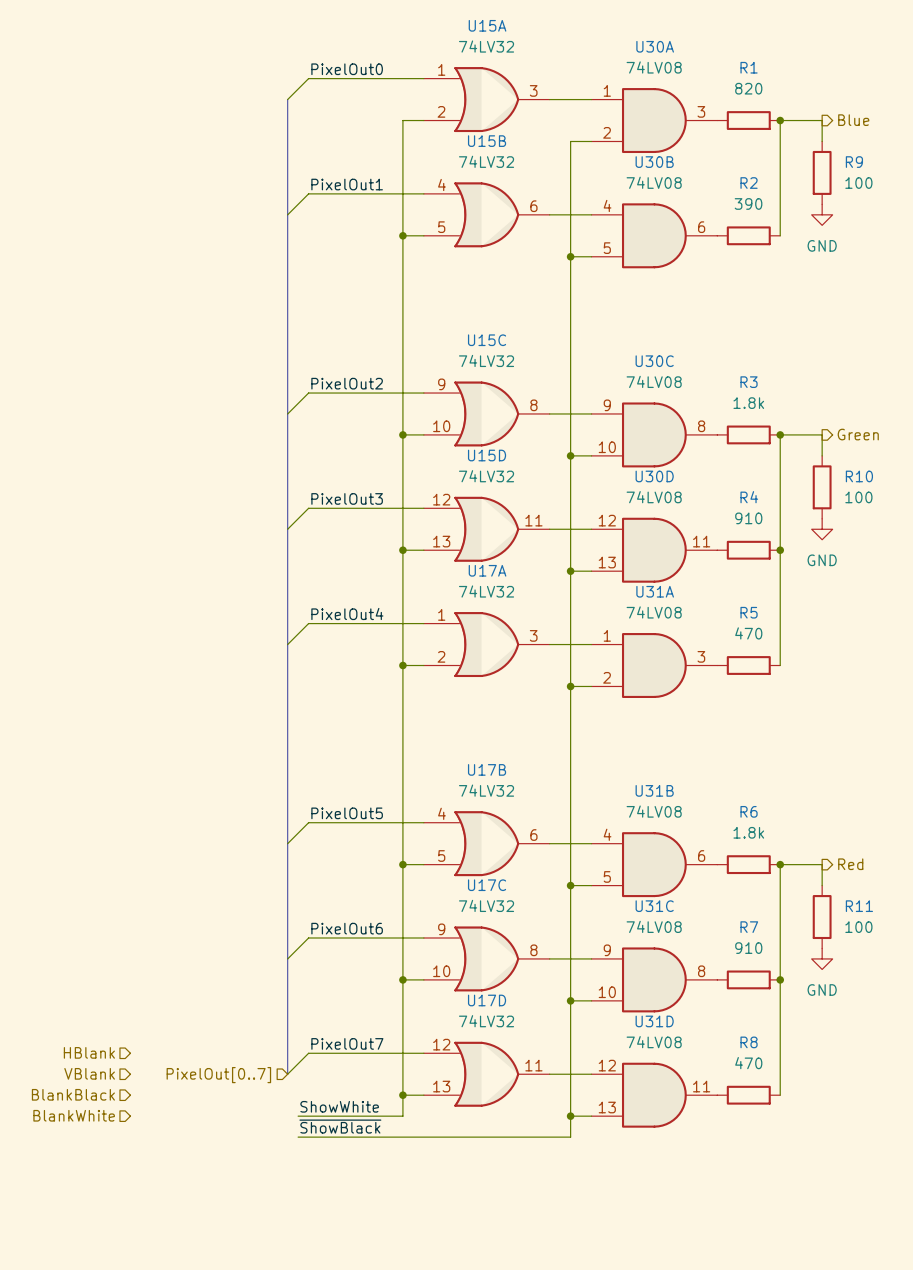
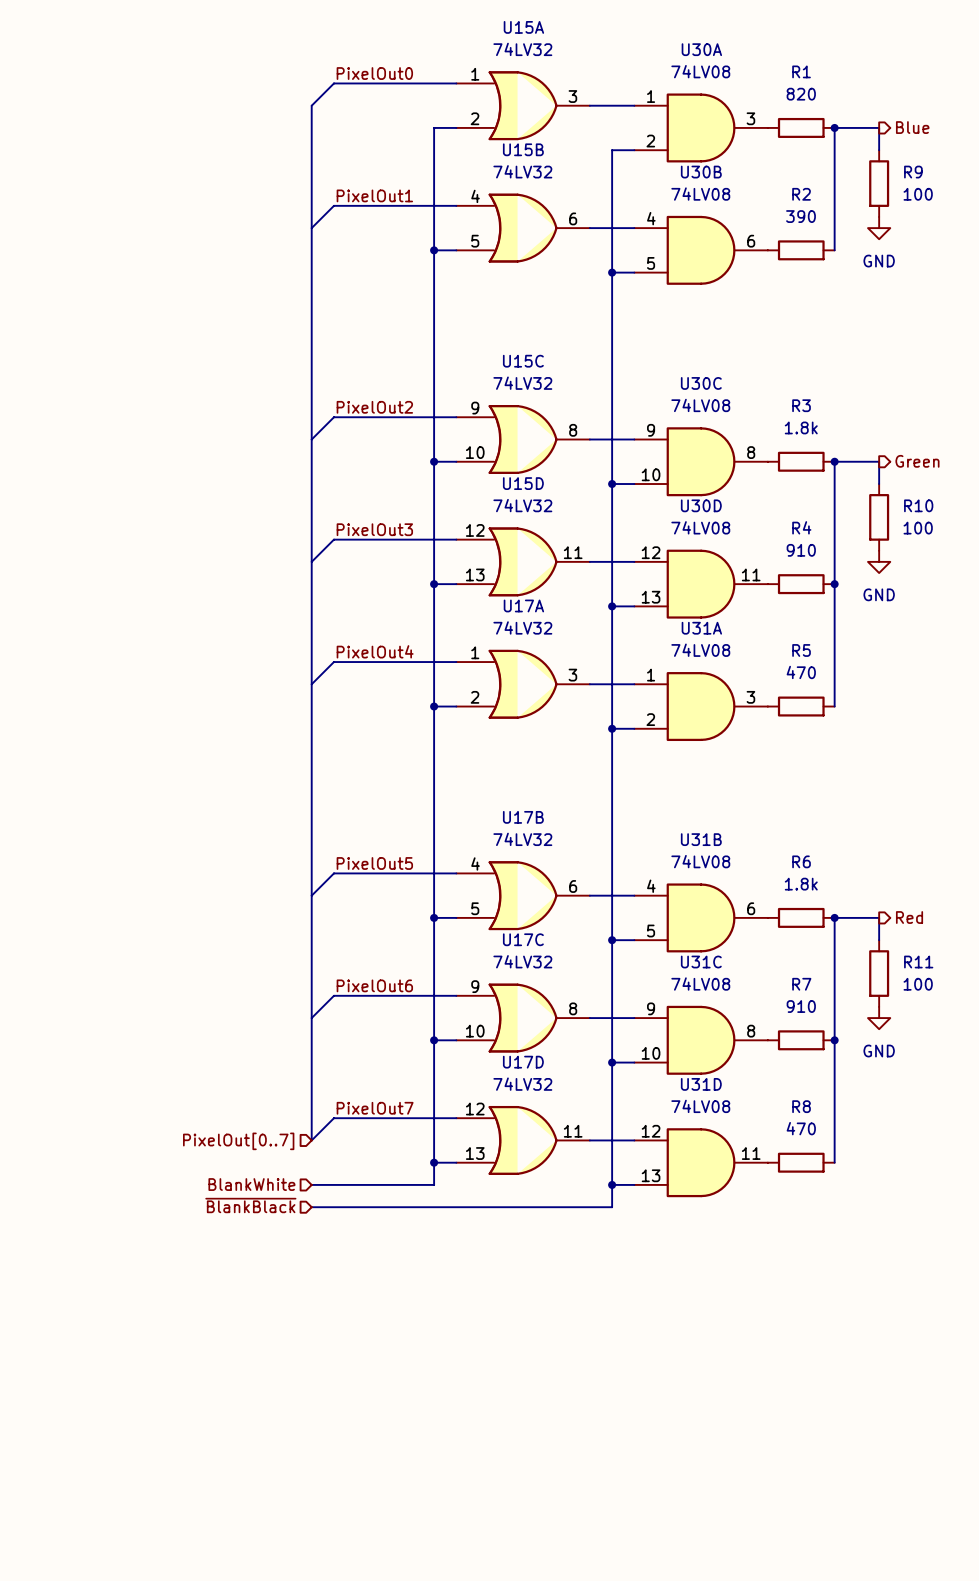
hierarchical label: HBlank (89, 1052) -> none
hierarchical label: VBlank (89, 1073) -> none
hierarchical label: BlankBlack (73, 1094) -> none
label: ShowWhite (339, 1106) -> none
hierarchical label position: BlankWhite (74, 1115) -> BlankWhite (251, 1184)
wire: none -> (311, 1184) (322, 1184)
label: ~{ShowBlack} (340, 1126) -> none
hierarchical label: none -> ~{BlankBlack} (250, 1205)
wire: none -> (311, 1207) (322, 1207)

